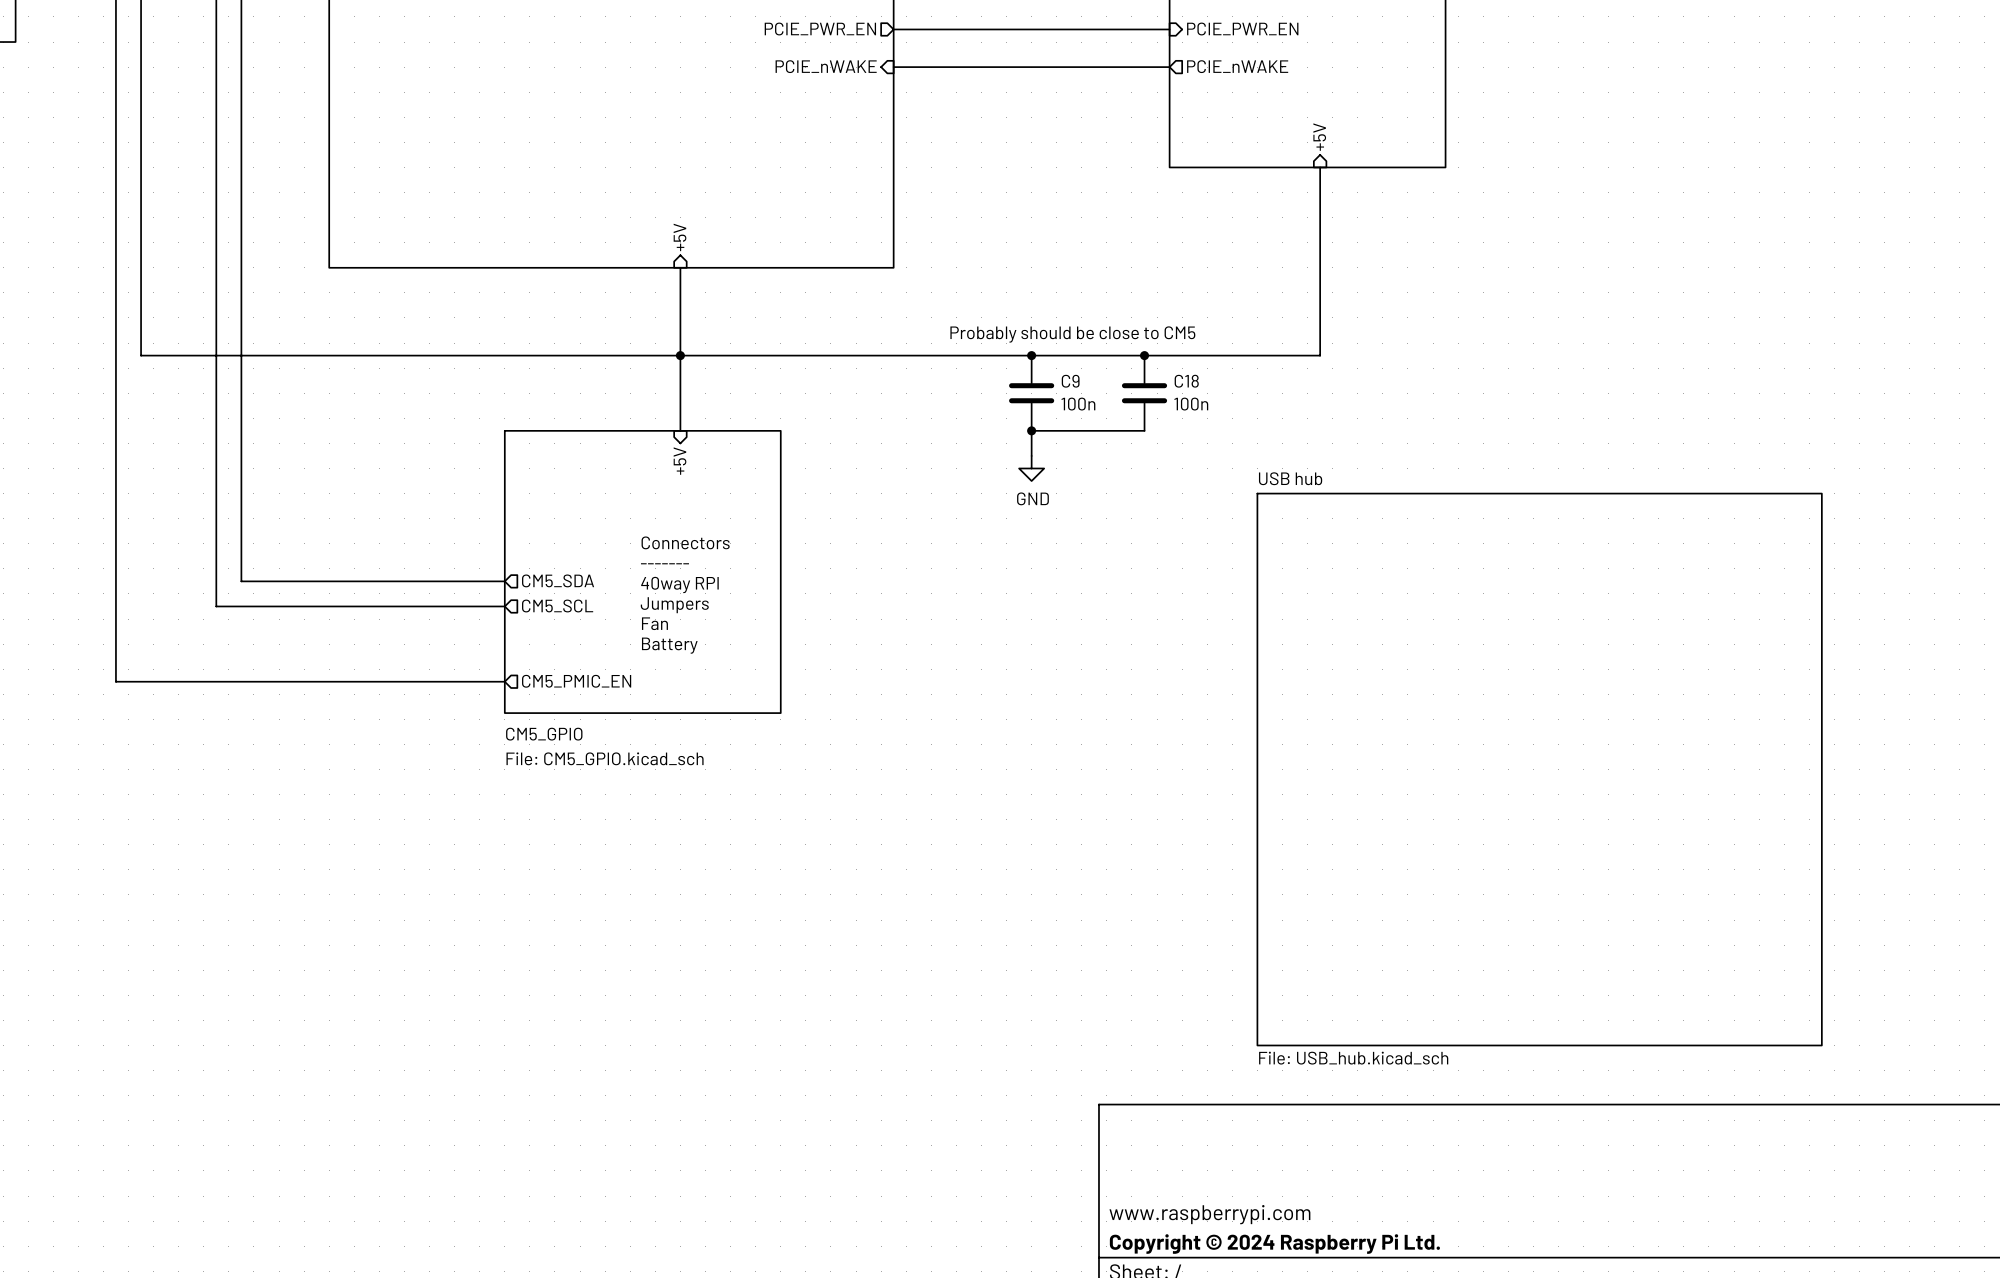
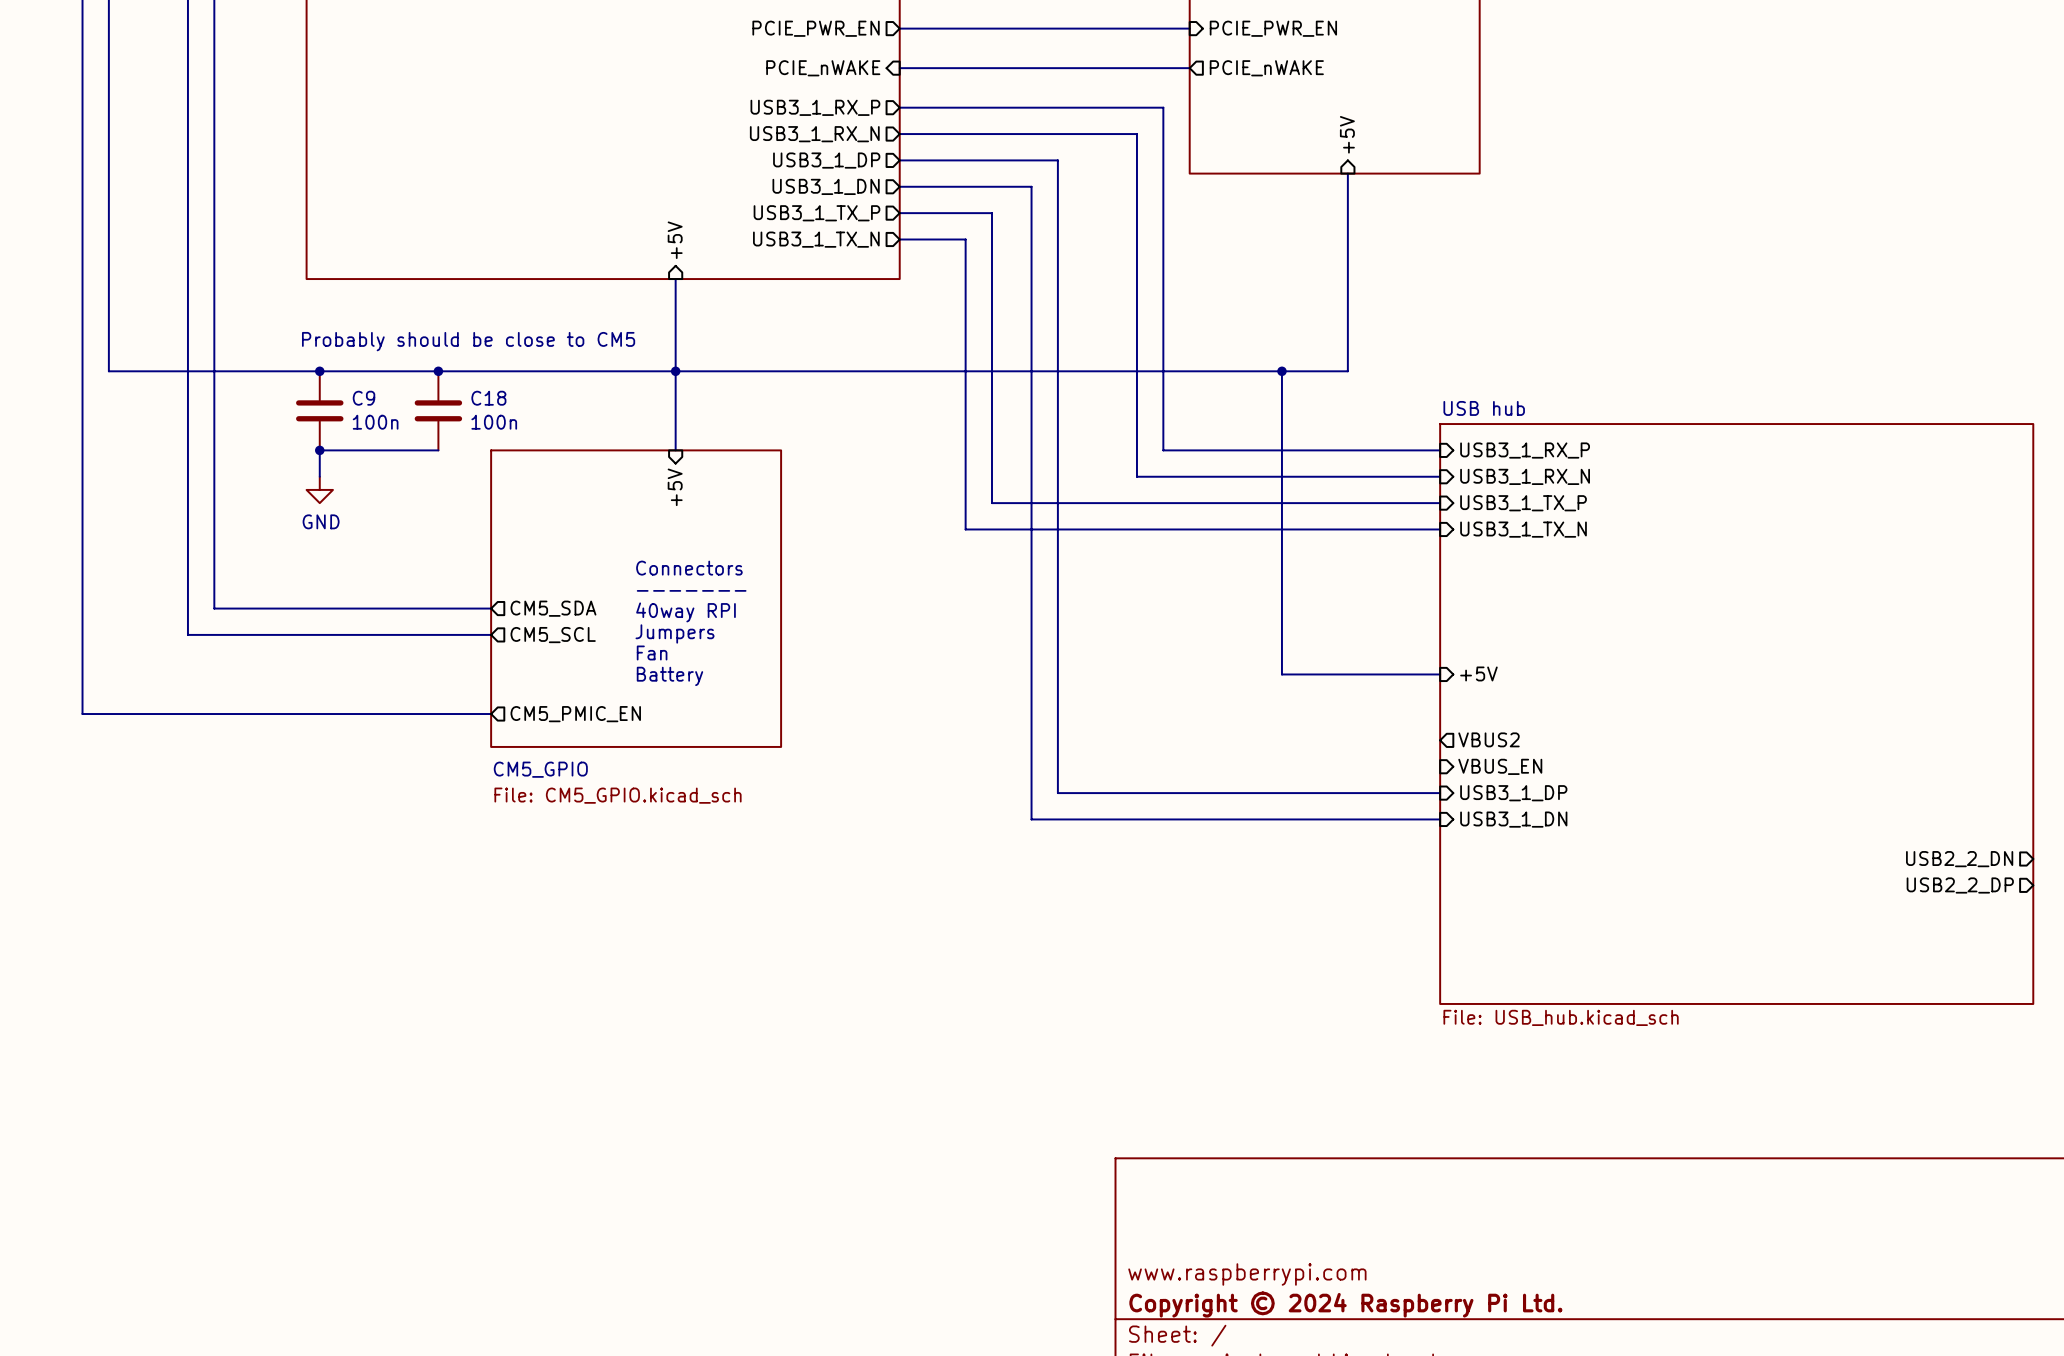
sheet pin: none -> USB3_1_RX_P (815, 107)
wire: none -> (899, 107) (1163, 107) (1163, 450) (1440, 450)
sheet pin: none -> USB3_1_RX_N (814, 134)
wire: none -> (899, 134) (1136, 134) (1136, 476) (1440, 476)
sheet pin: none -> USB3_1_DP (826, 160)
wire: none -> (899, 160) (1057, 160) (1057, 793) (1440, 793)
sheet pin: none -> USB3_1_DN (826, 186)
wire: none -> (899, 186) (1031, 186) (1031, 819) (1440, 819)
sheet pin: none -> USB3_1_TX_P (816, 213)
wire: none -> (899, 213) (991, 213) (991, 503) (1440, 503)
sheet pin: none -> USB3_1_TX_N (816, 239)
wire: none -> (899, 239) (965, 239) (965, 529) (1440, 529)
text: none -> Probably should be close to CM5 (468, 341)
text: Probably should be close to CM5 (1072, 334) -> none
junction: none -> (319, 371)
junction: none -> (438, 371)
junction: (1031, 355) -> none
junction: (1144, 355) -> none
wire: none -> (1281, 371) (1281, 674) (1440, 674)
junction: none -> (1281, 371)
C9 position: (1031, 393) -> (319, 410)
C18 position: (1144, 393) -> (438, 410)
junction: none -> (319, 450)
wire: none -> (438, 450) (319, 450) (319, 476)
junction: (1031, 430) -> none
wire: (1144, 430) (1031, 430) (1031, 455) -> none
sheet pin: none -> USB3_1_RX_P (1525, 450)
sheet pin: none -> USB3_1_RX_N (1525, 476)
power symbol: none -> GND (319, 489)
power symbol: GND (1031, 468) -> none
sheet pin: none -> USB3_1_TX_P (1523, 503)
sheet pin: none -> USB3_1_TX_N (1523, 529)
sheet pin: none -> +5V (1478, 673)
sheet pin: none -> VBUS2 (1488, 739)
sheet pin: none -> VBUS_EN (1500, 766)
sheet pin: none -> USB3_1_DP (1513, 793)
sheet USB hub position: (1539, 769) -> (1736, 714)
sheet pin: none -> USB3_1_DN (1513, 819)
sheet pin: none -> USB2_2_DN (1959, 859)
sheet pin: none -> USB2_2_DP (1960, 885)

